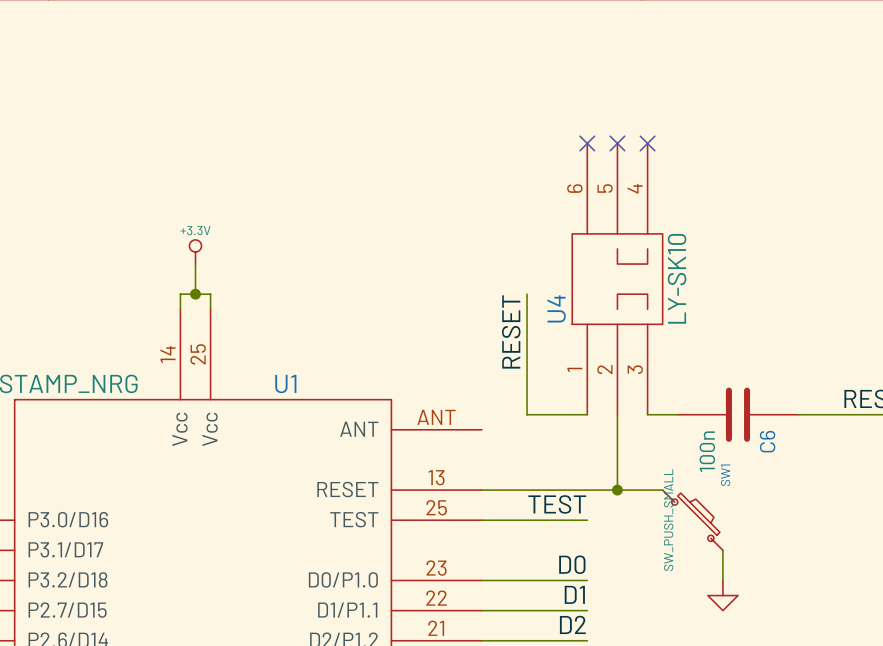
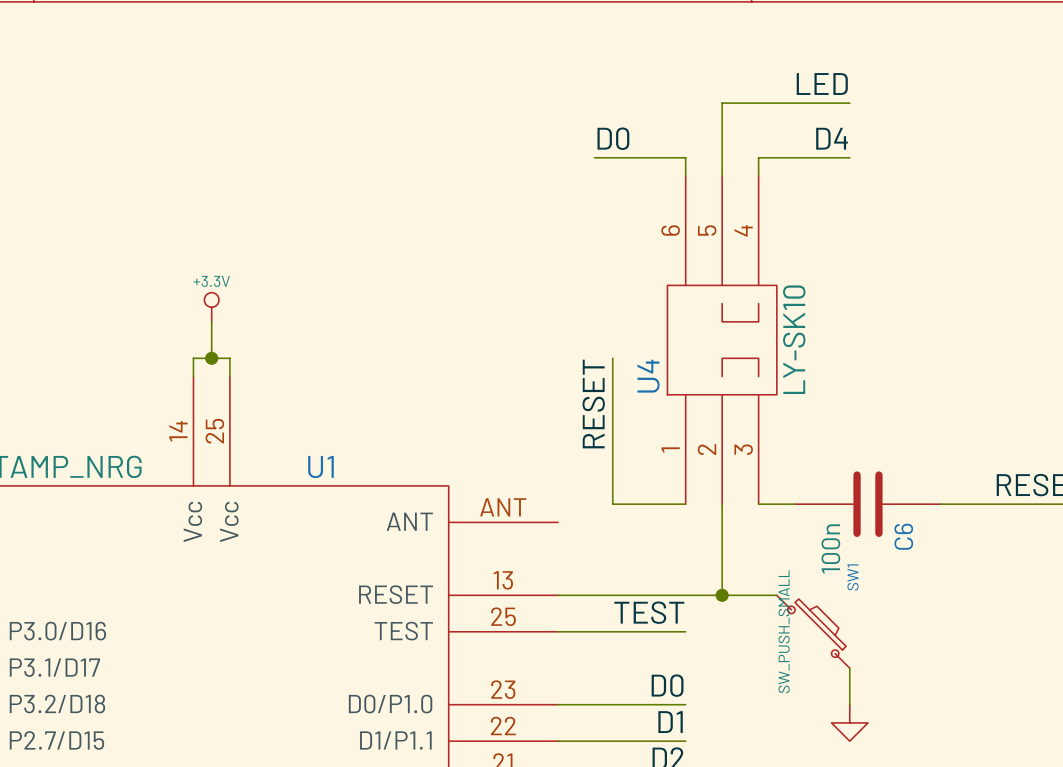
label: none -> LED (822, 84)
wire: none -> (849, 103) (722, 103) (722, 176)
label: none -> D0 (613, 138)
label: none -> D4 (832, 138)
wire: none -> (594, 157) (685, 157) (685, 176)
wire: none -> (849, 157) (758, 157) (758, 176)
no-connect mark: (587, 143) -> none
no-connect mark: (617, 143) -> none
no-connect mark: (647, 143) -> none

